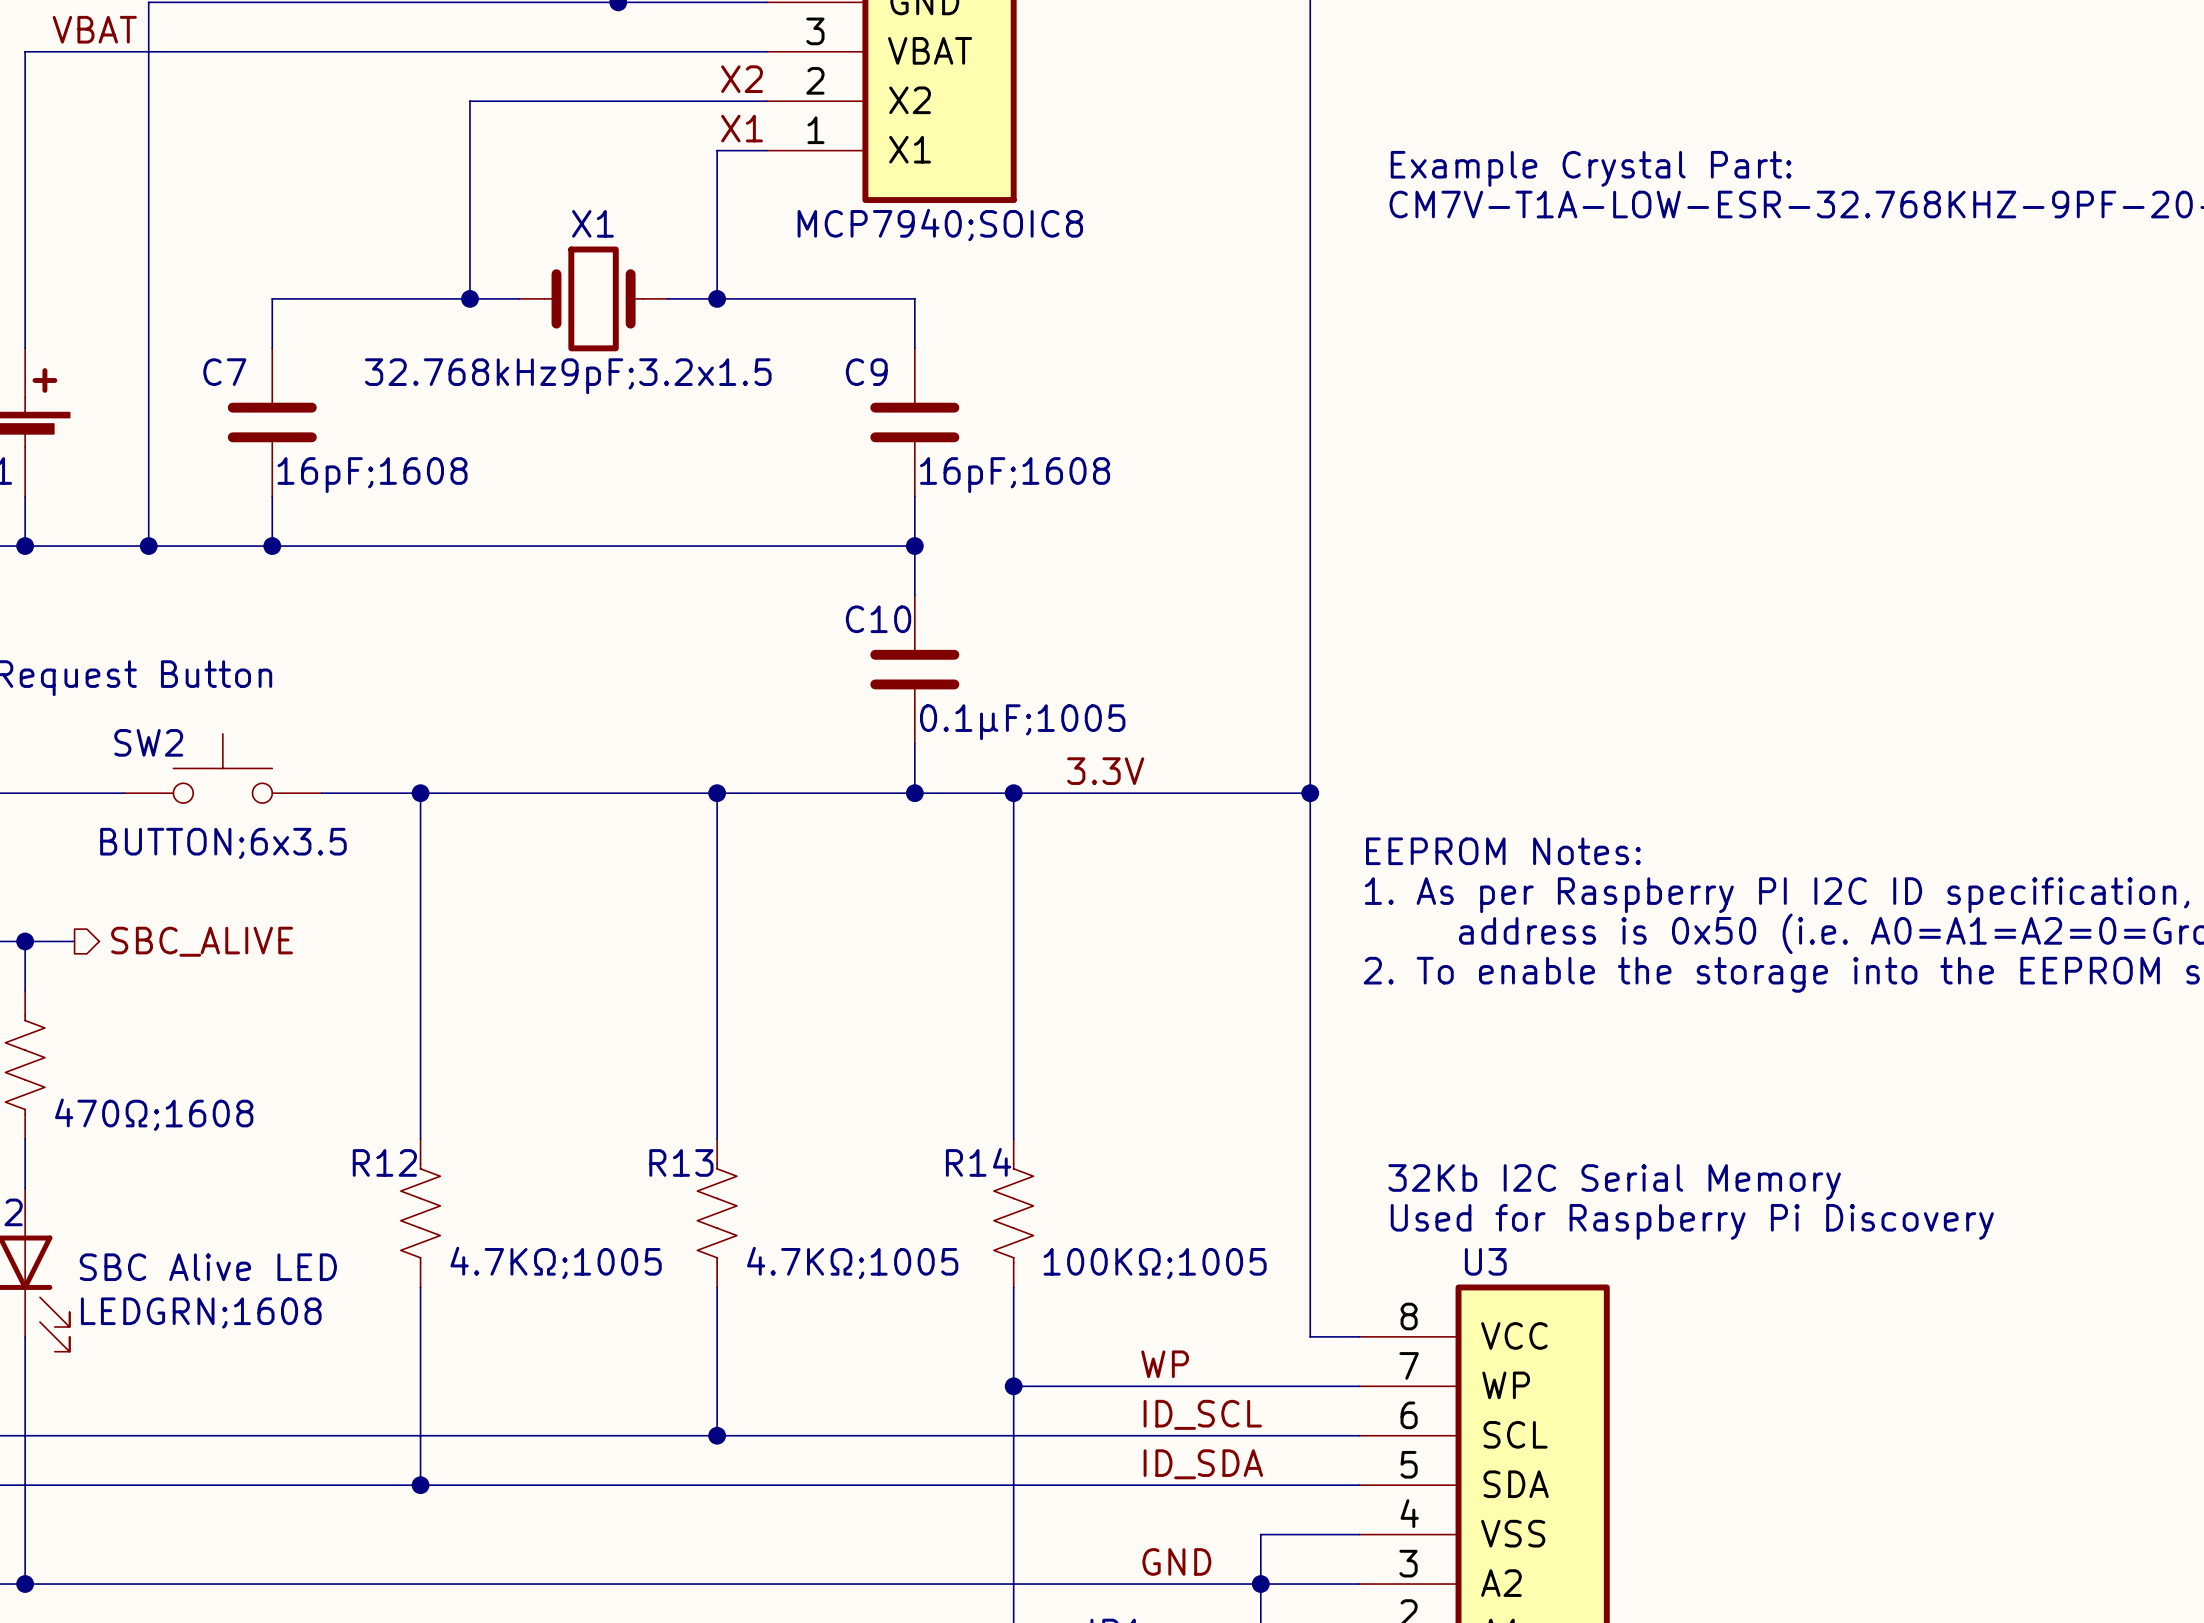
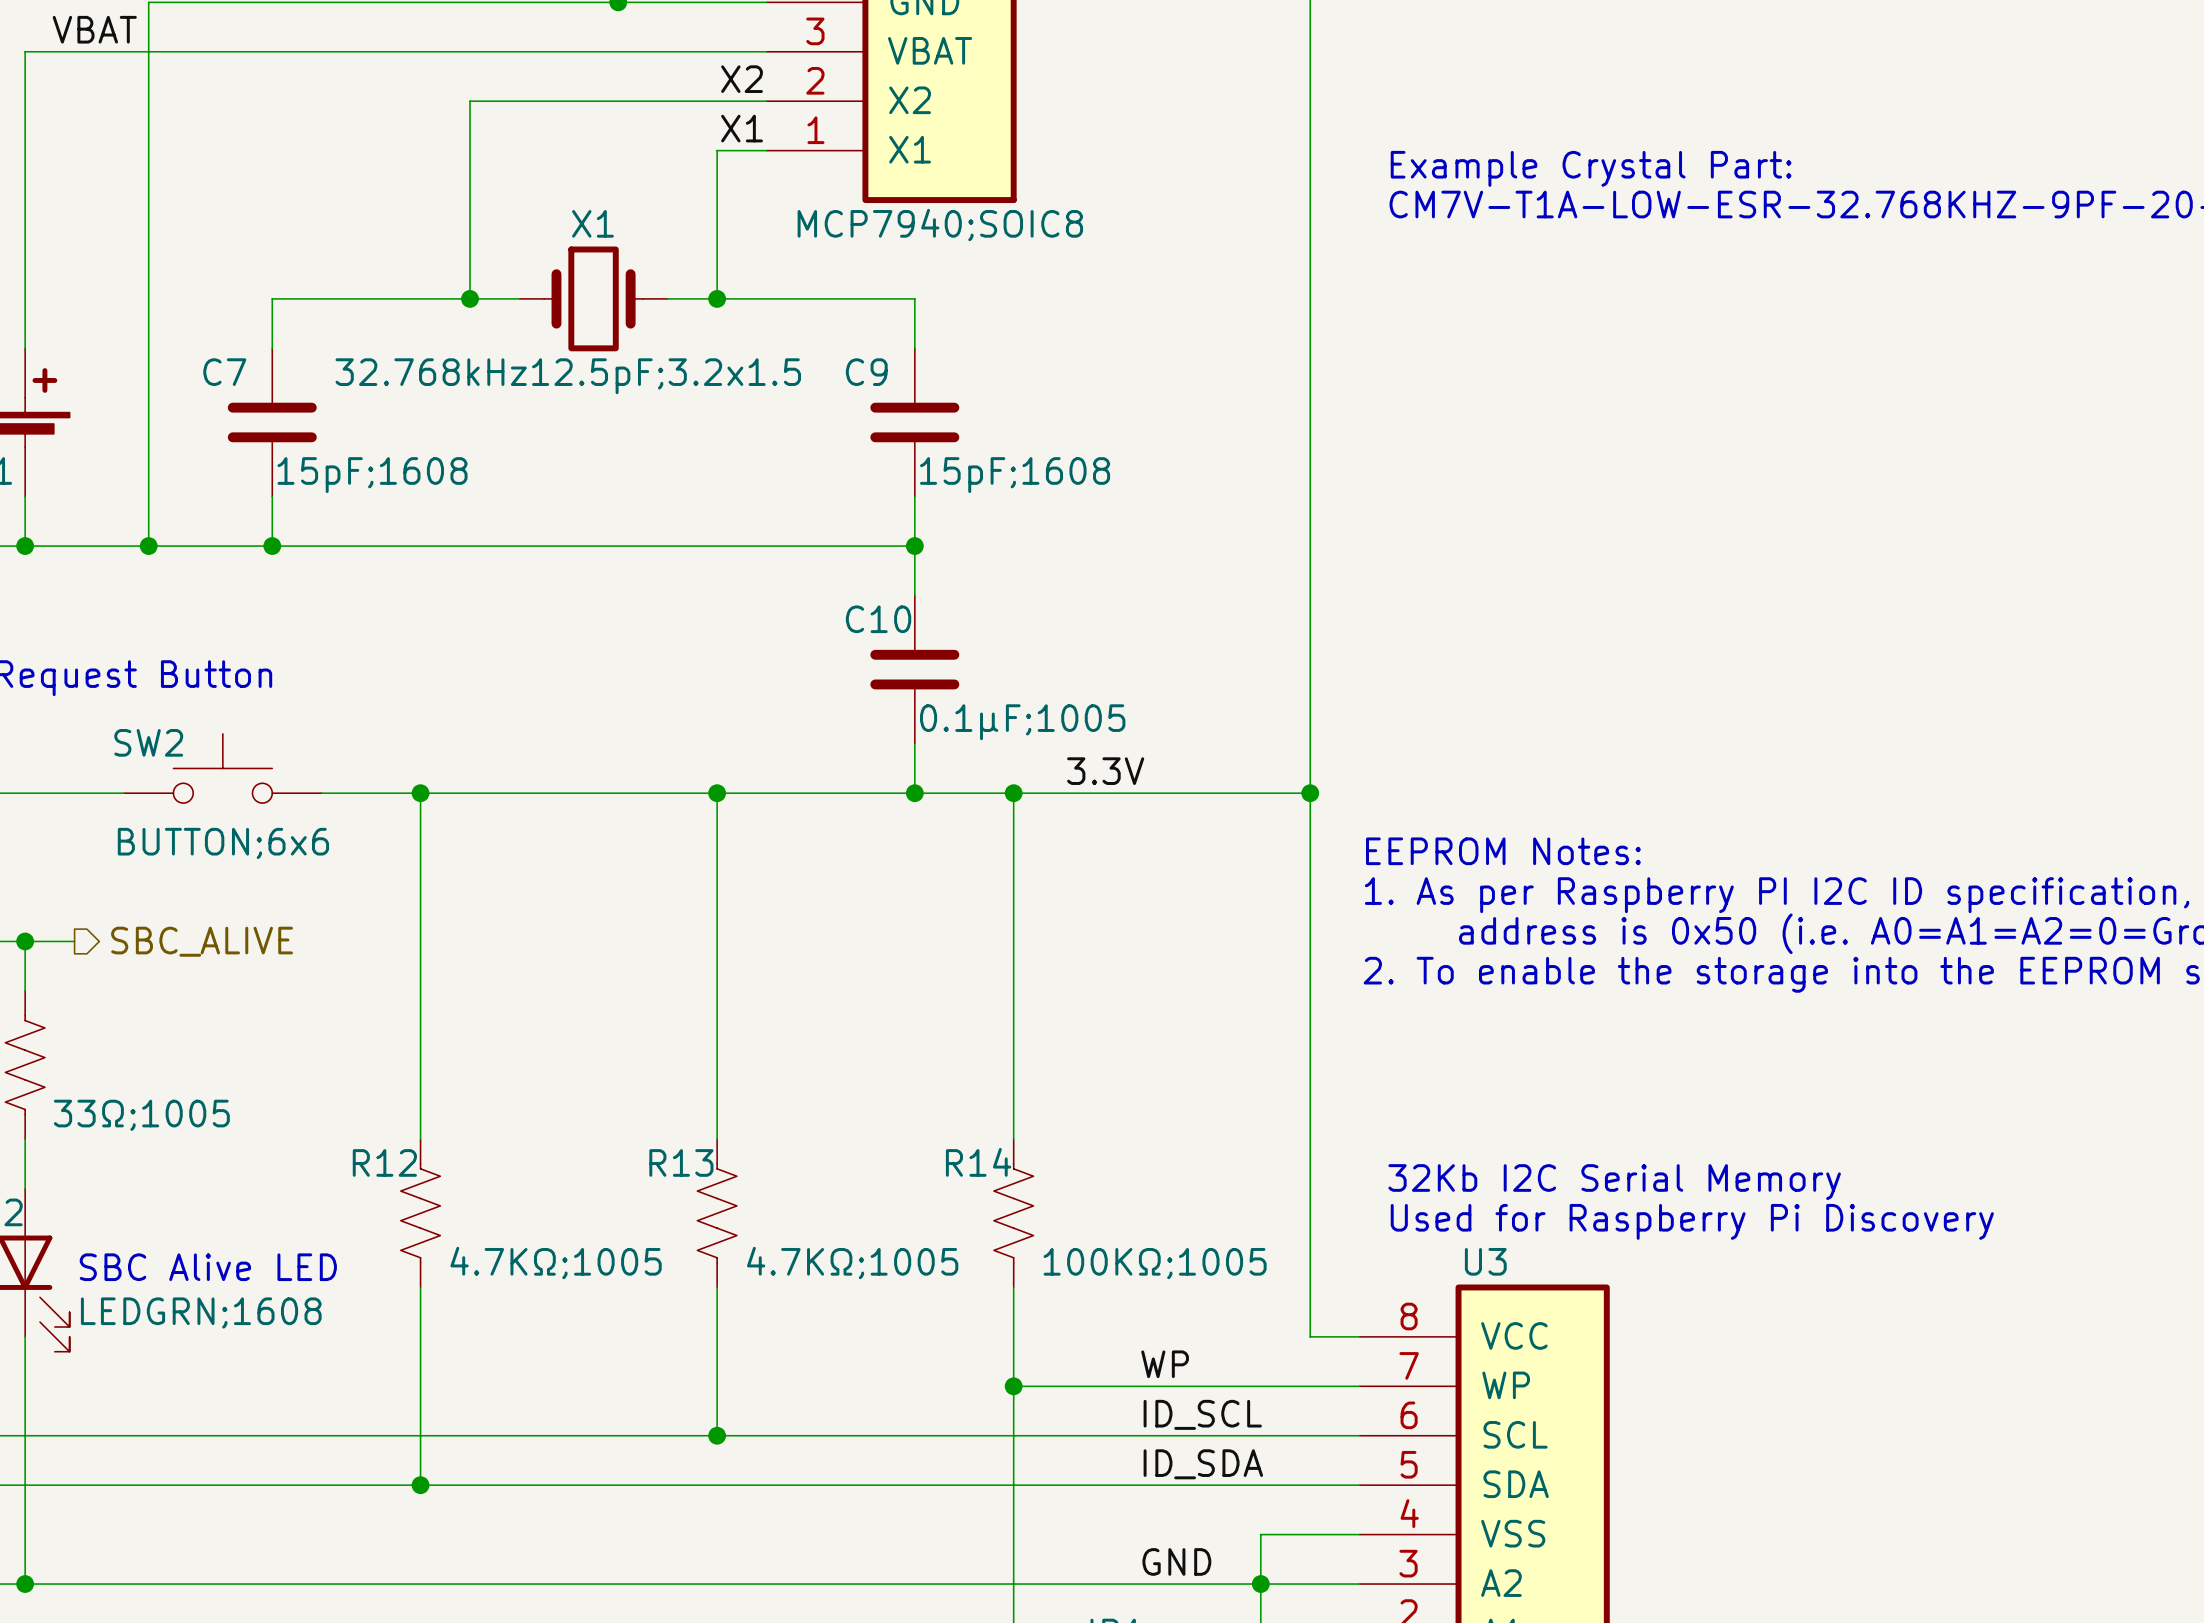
X1 value: 32.768kHz9pF;3.2x1.5 (568, 376) -> 32.768kHz12.5pF;3.2x1.5 (568, 376)
C7 value: 16pF;1608 (372, 475) -> 15pF;1608 (372, 475)
C9 value: 16pF;1608 (1015, 475) -> 15pF;1608 (1015, 475)
SW2 value: BUTTON;6x3.5 (223, 843) -> BUTTON;6x6 (223, 843)
part value: 470Ω;1608 (154, 1114) -> 33Ω;1005 (141, 1115)

